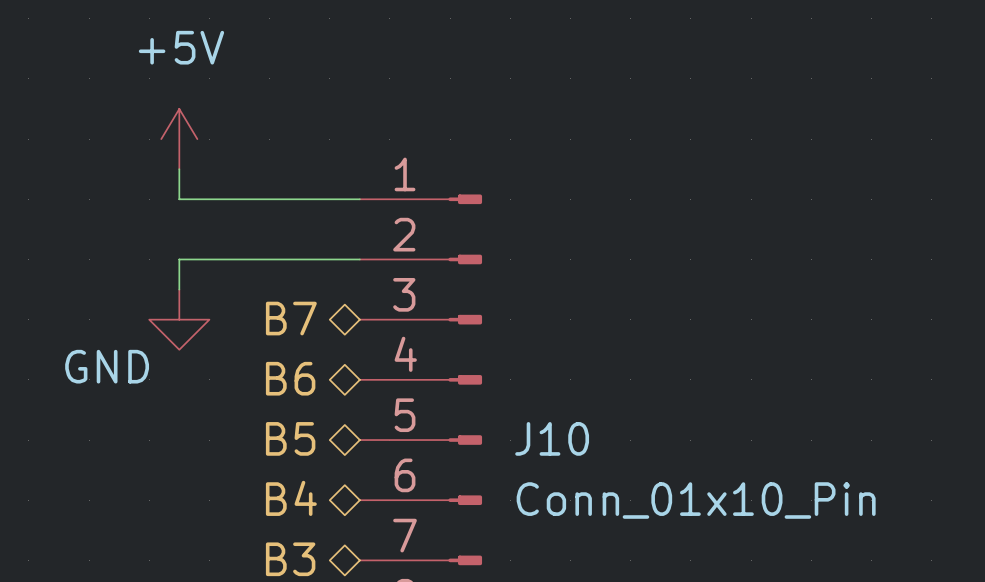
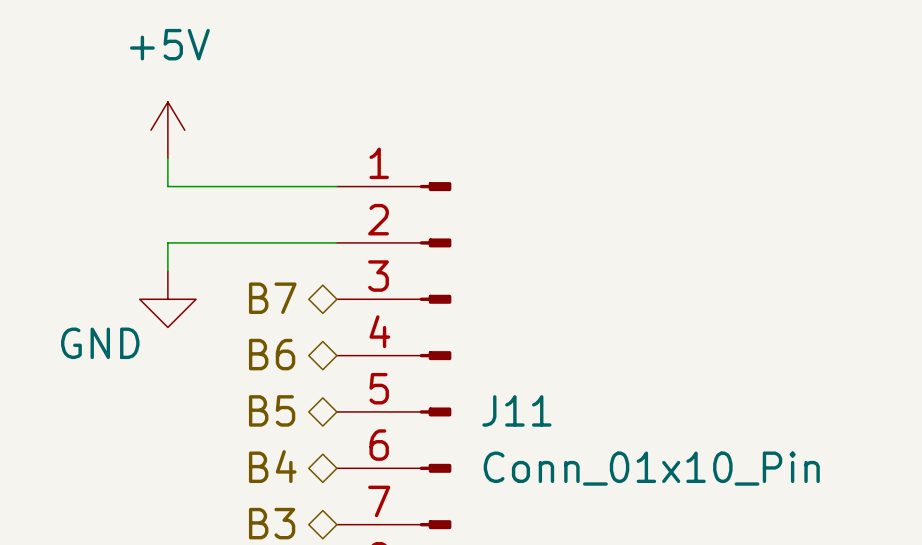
J10 name: J10 (552, 438) -> J11 (516, 410)

